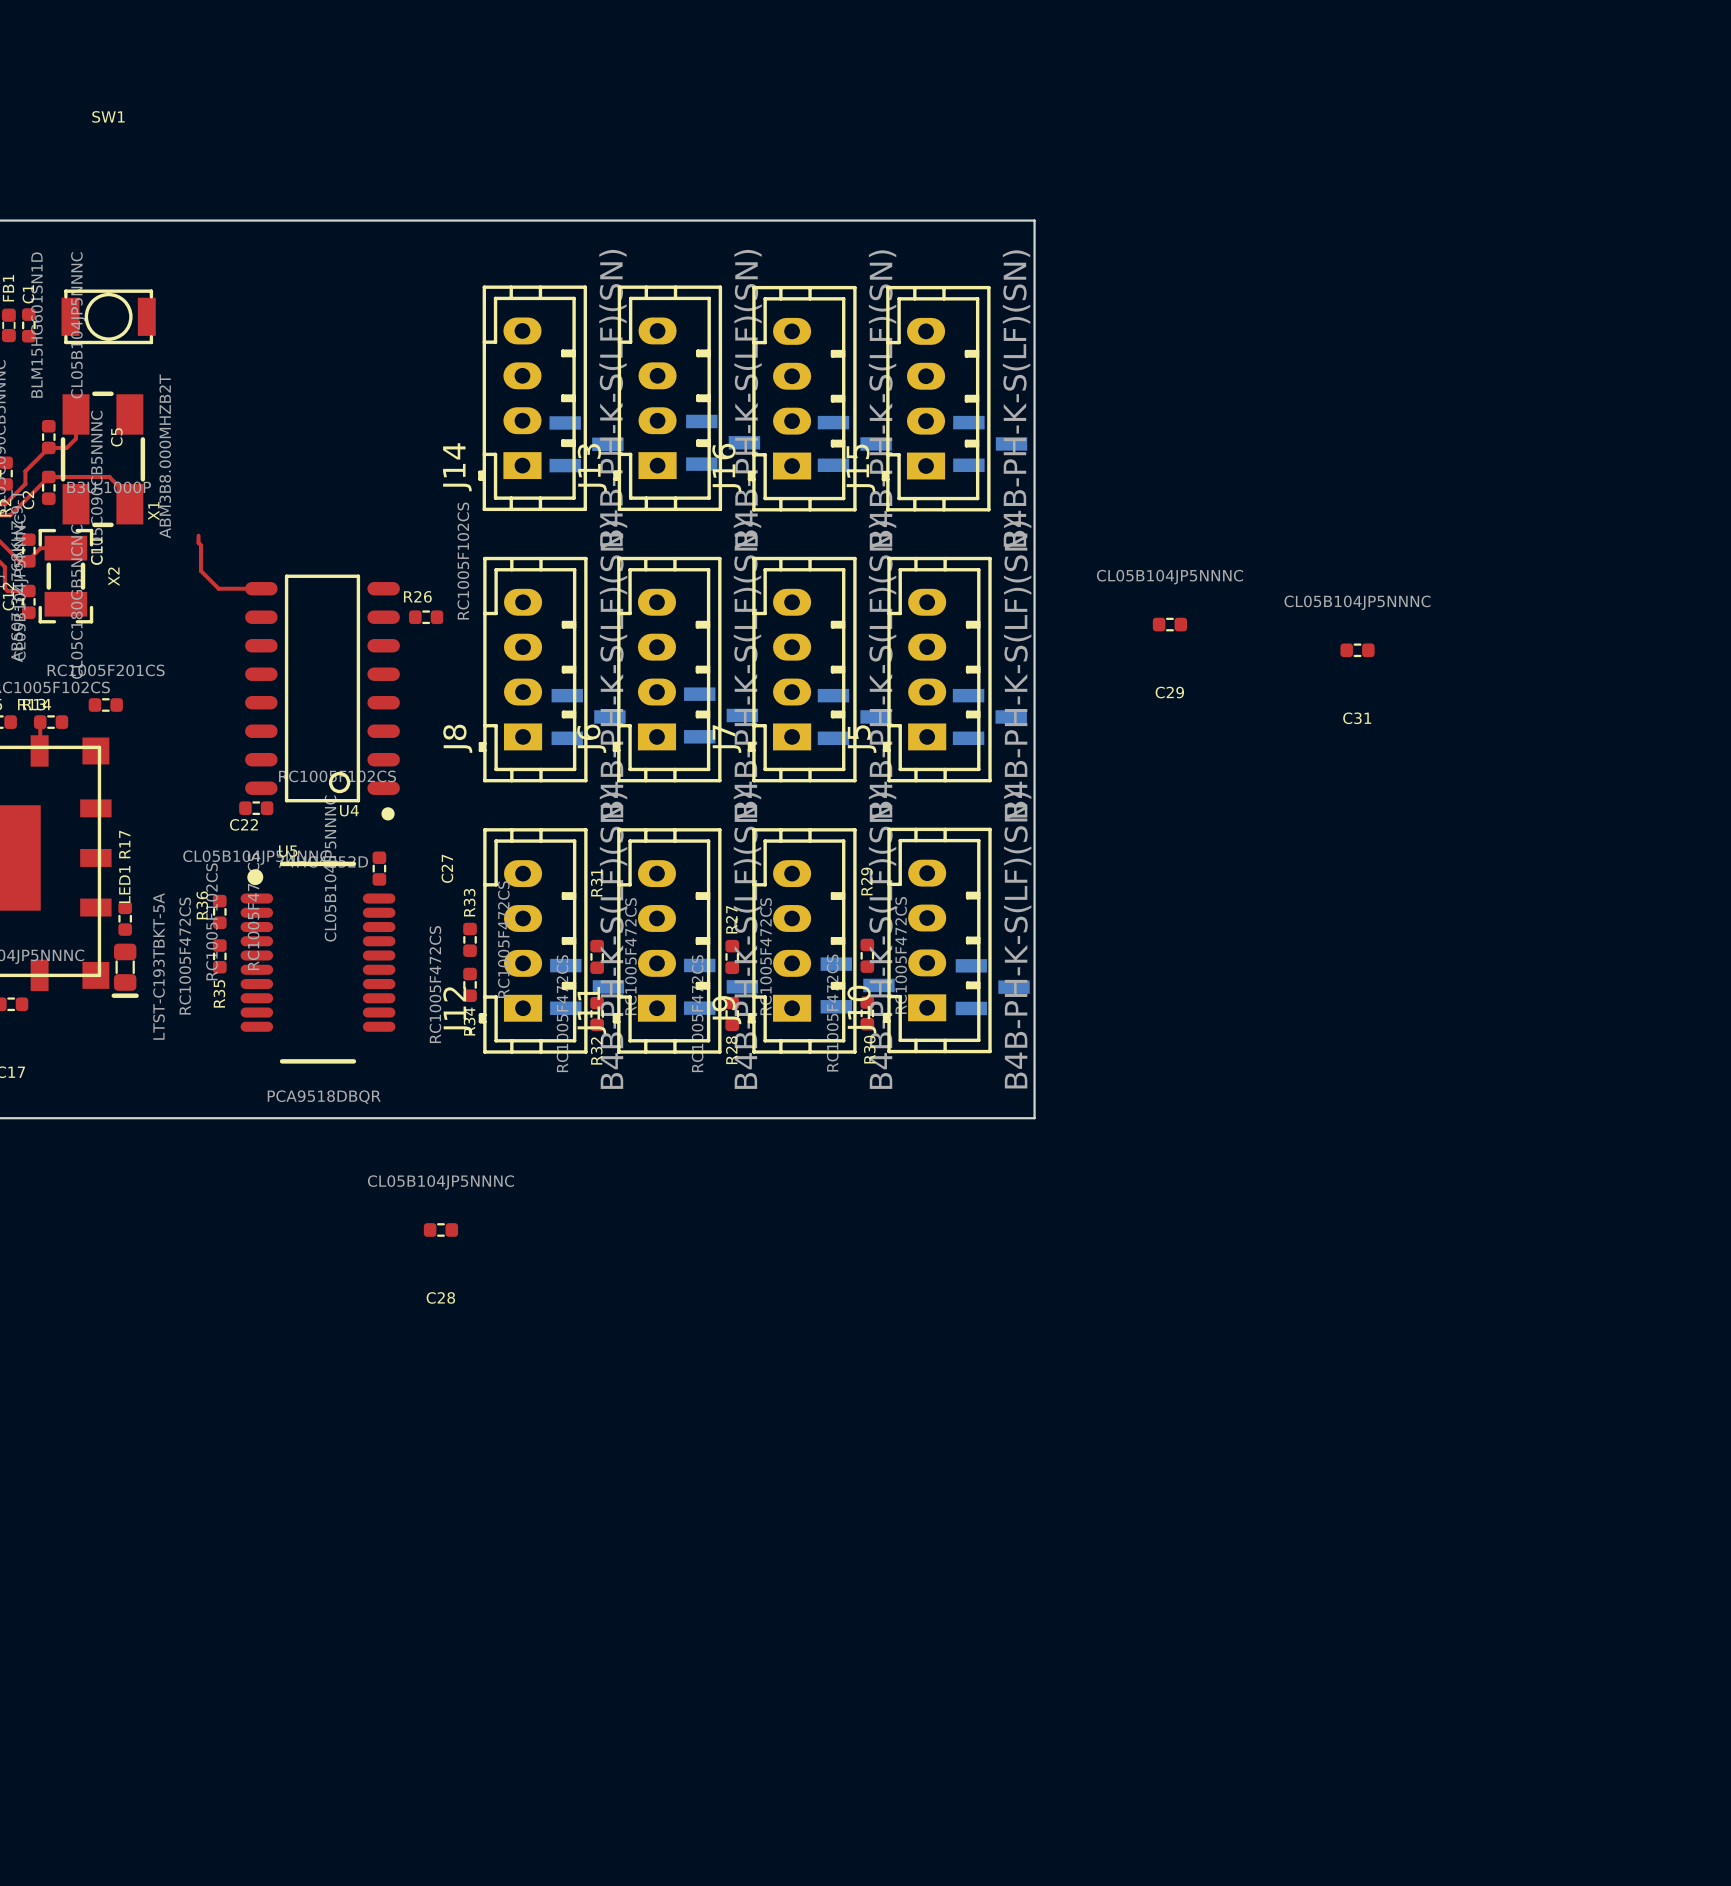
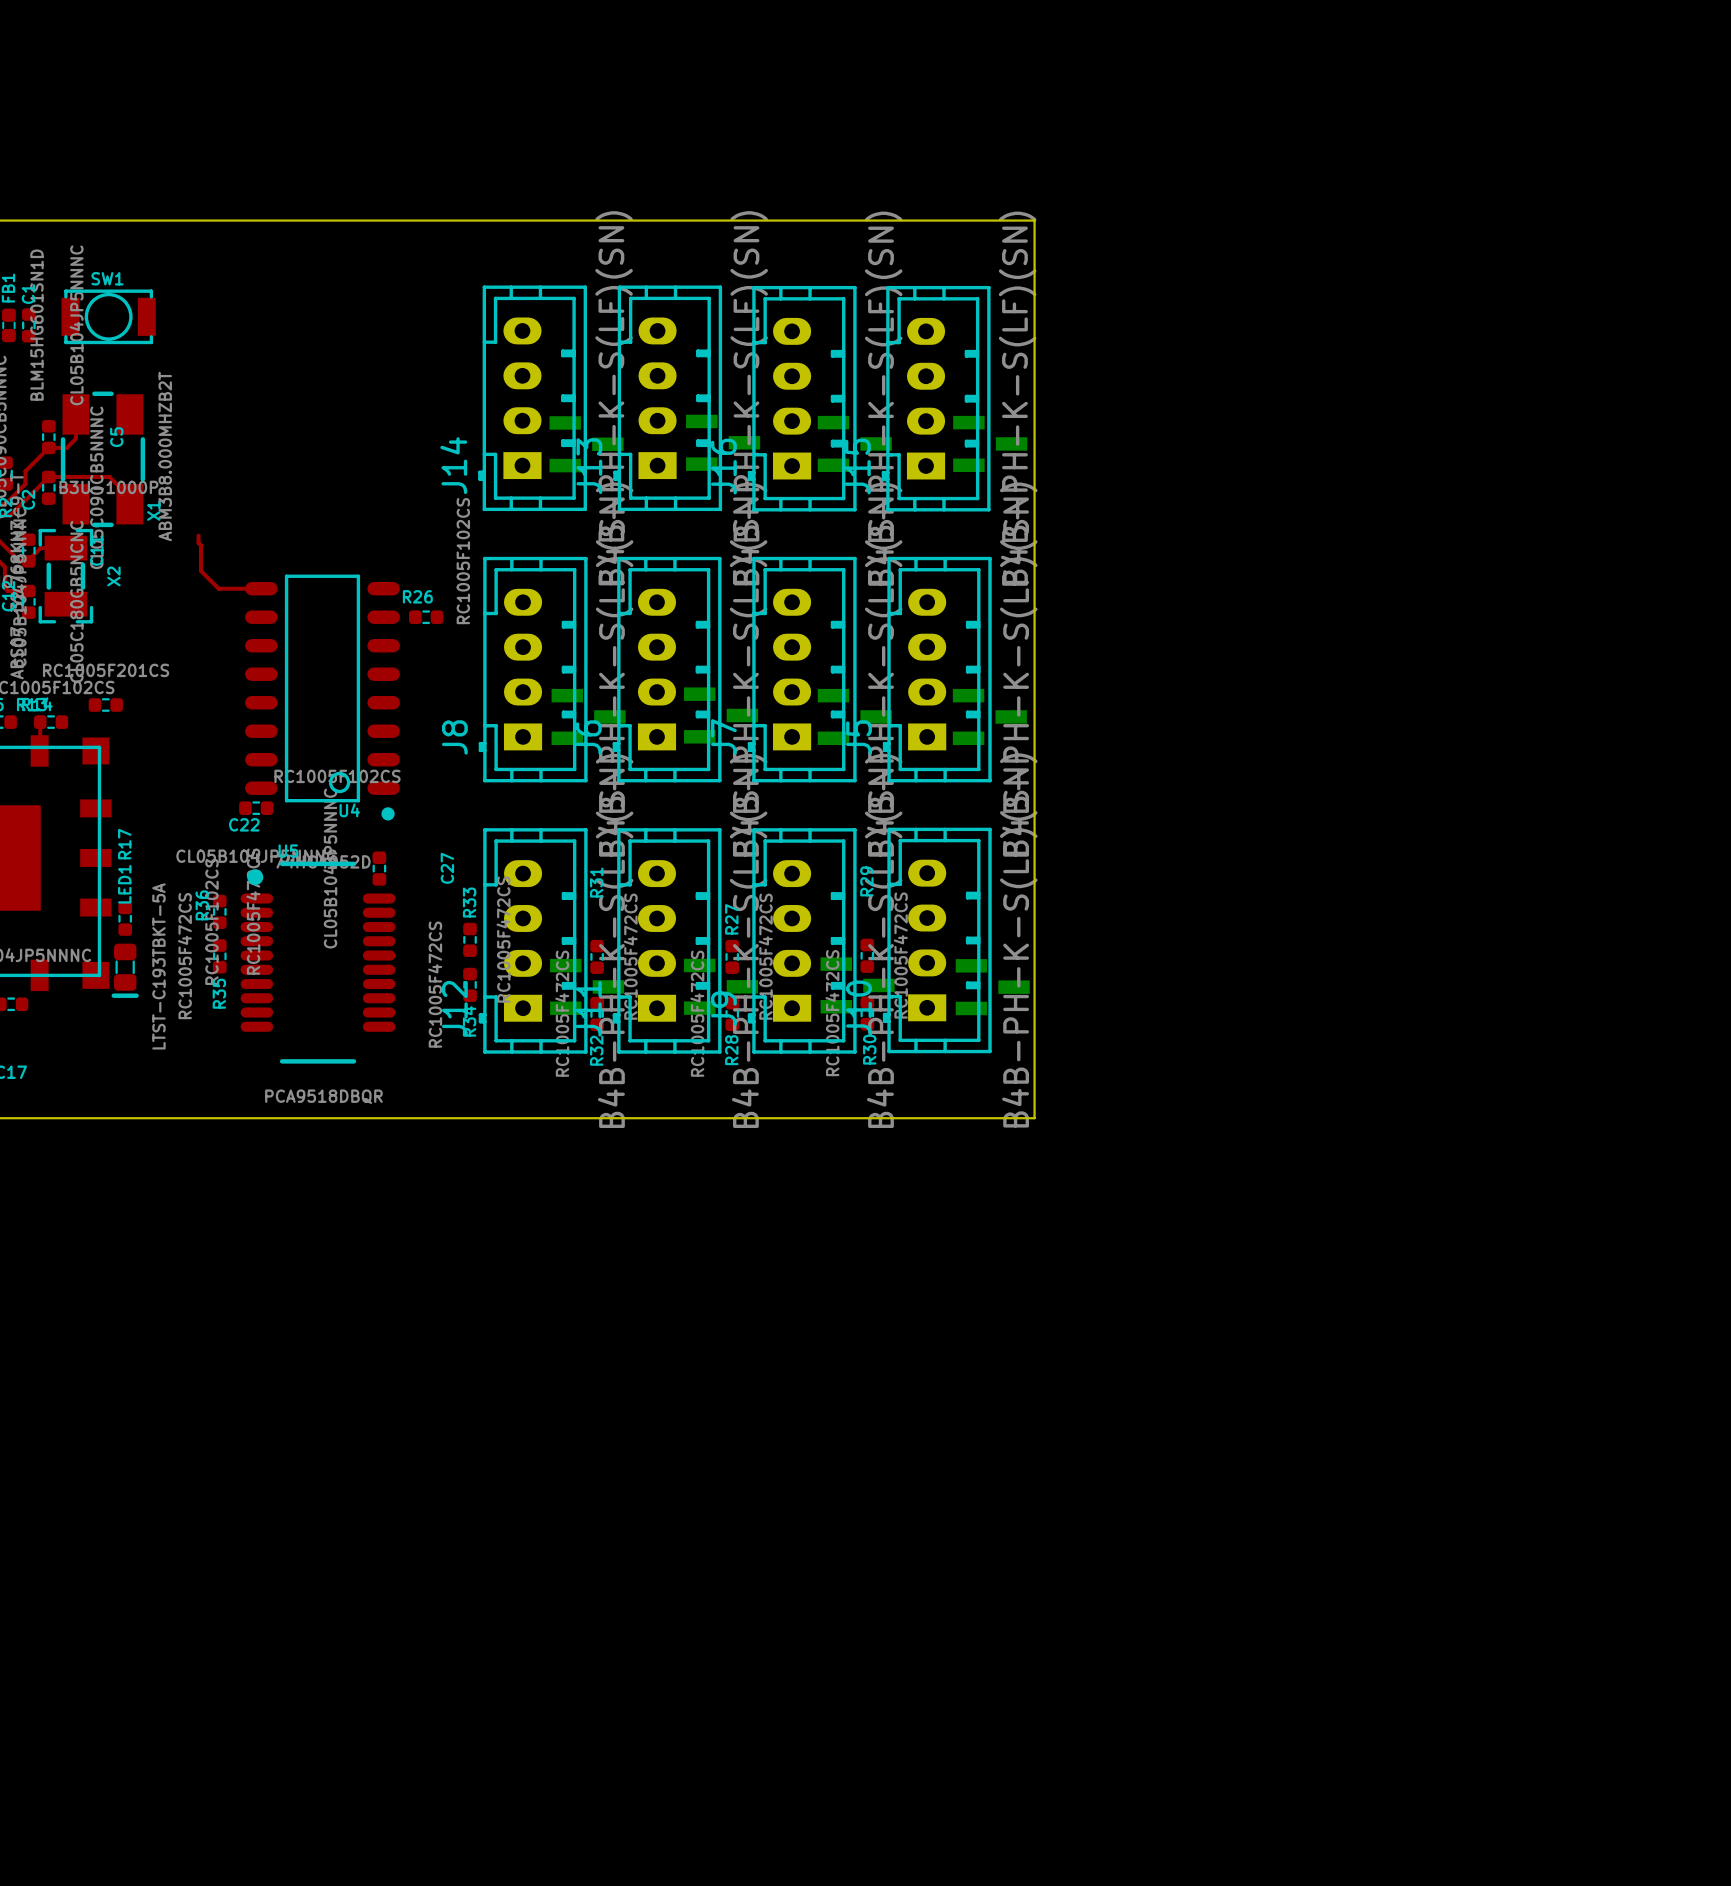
SW1 name position: SW1 (108, 116) -> SW1 (107, 278)
C29: CL05B104JP5NNNC (1169, 624) -> none
C31: CL05B104JP5NNNC (1357, 650) -> none
C28: CL05B104JP5NNNC (440, 1229) -> none

